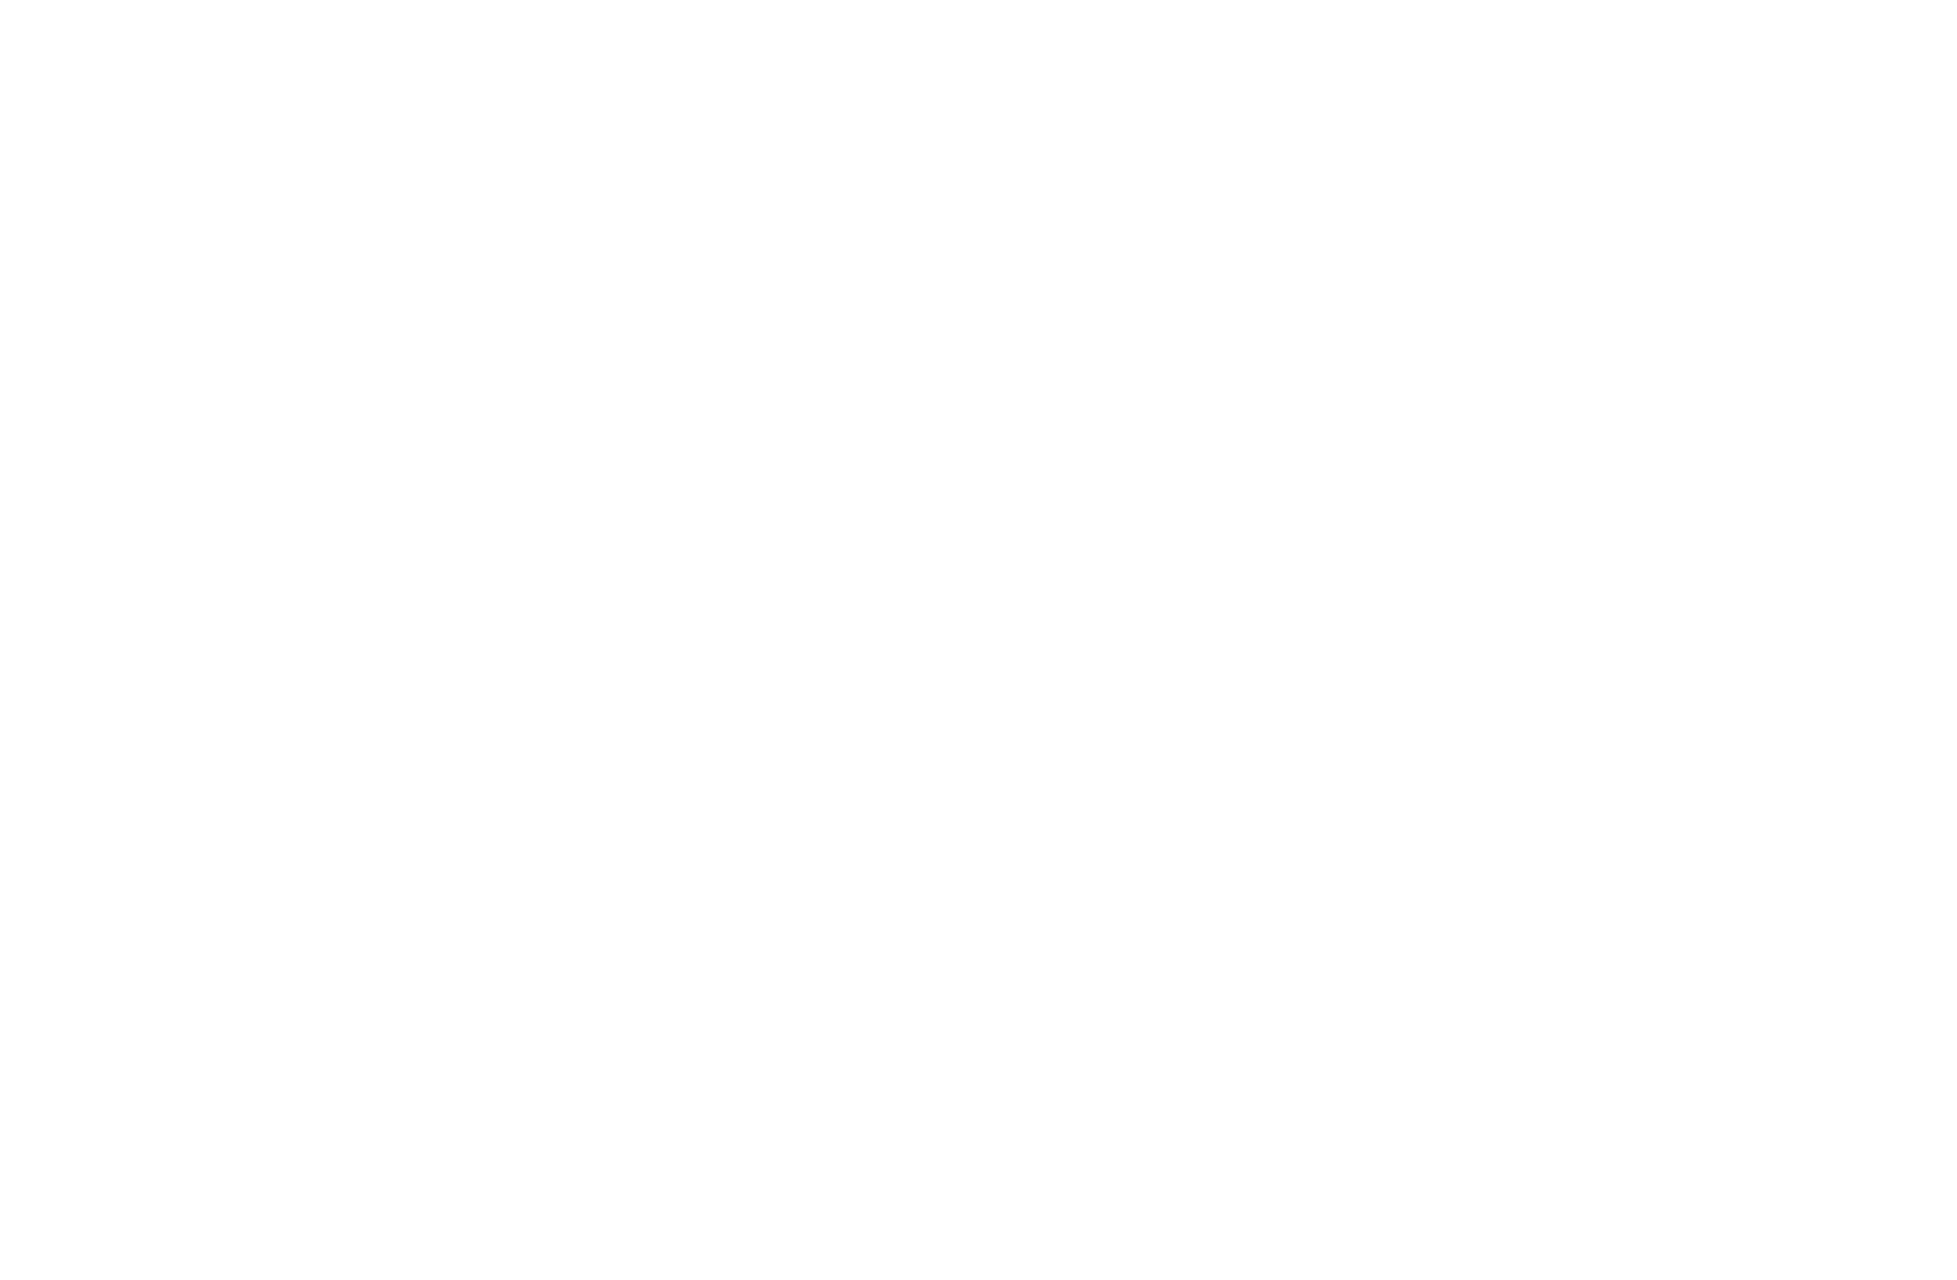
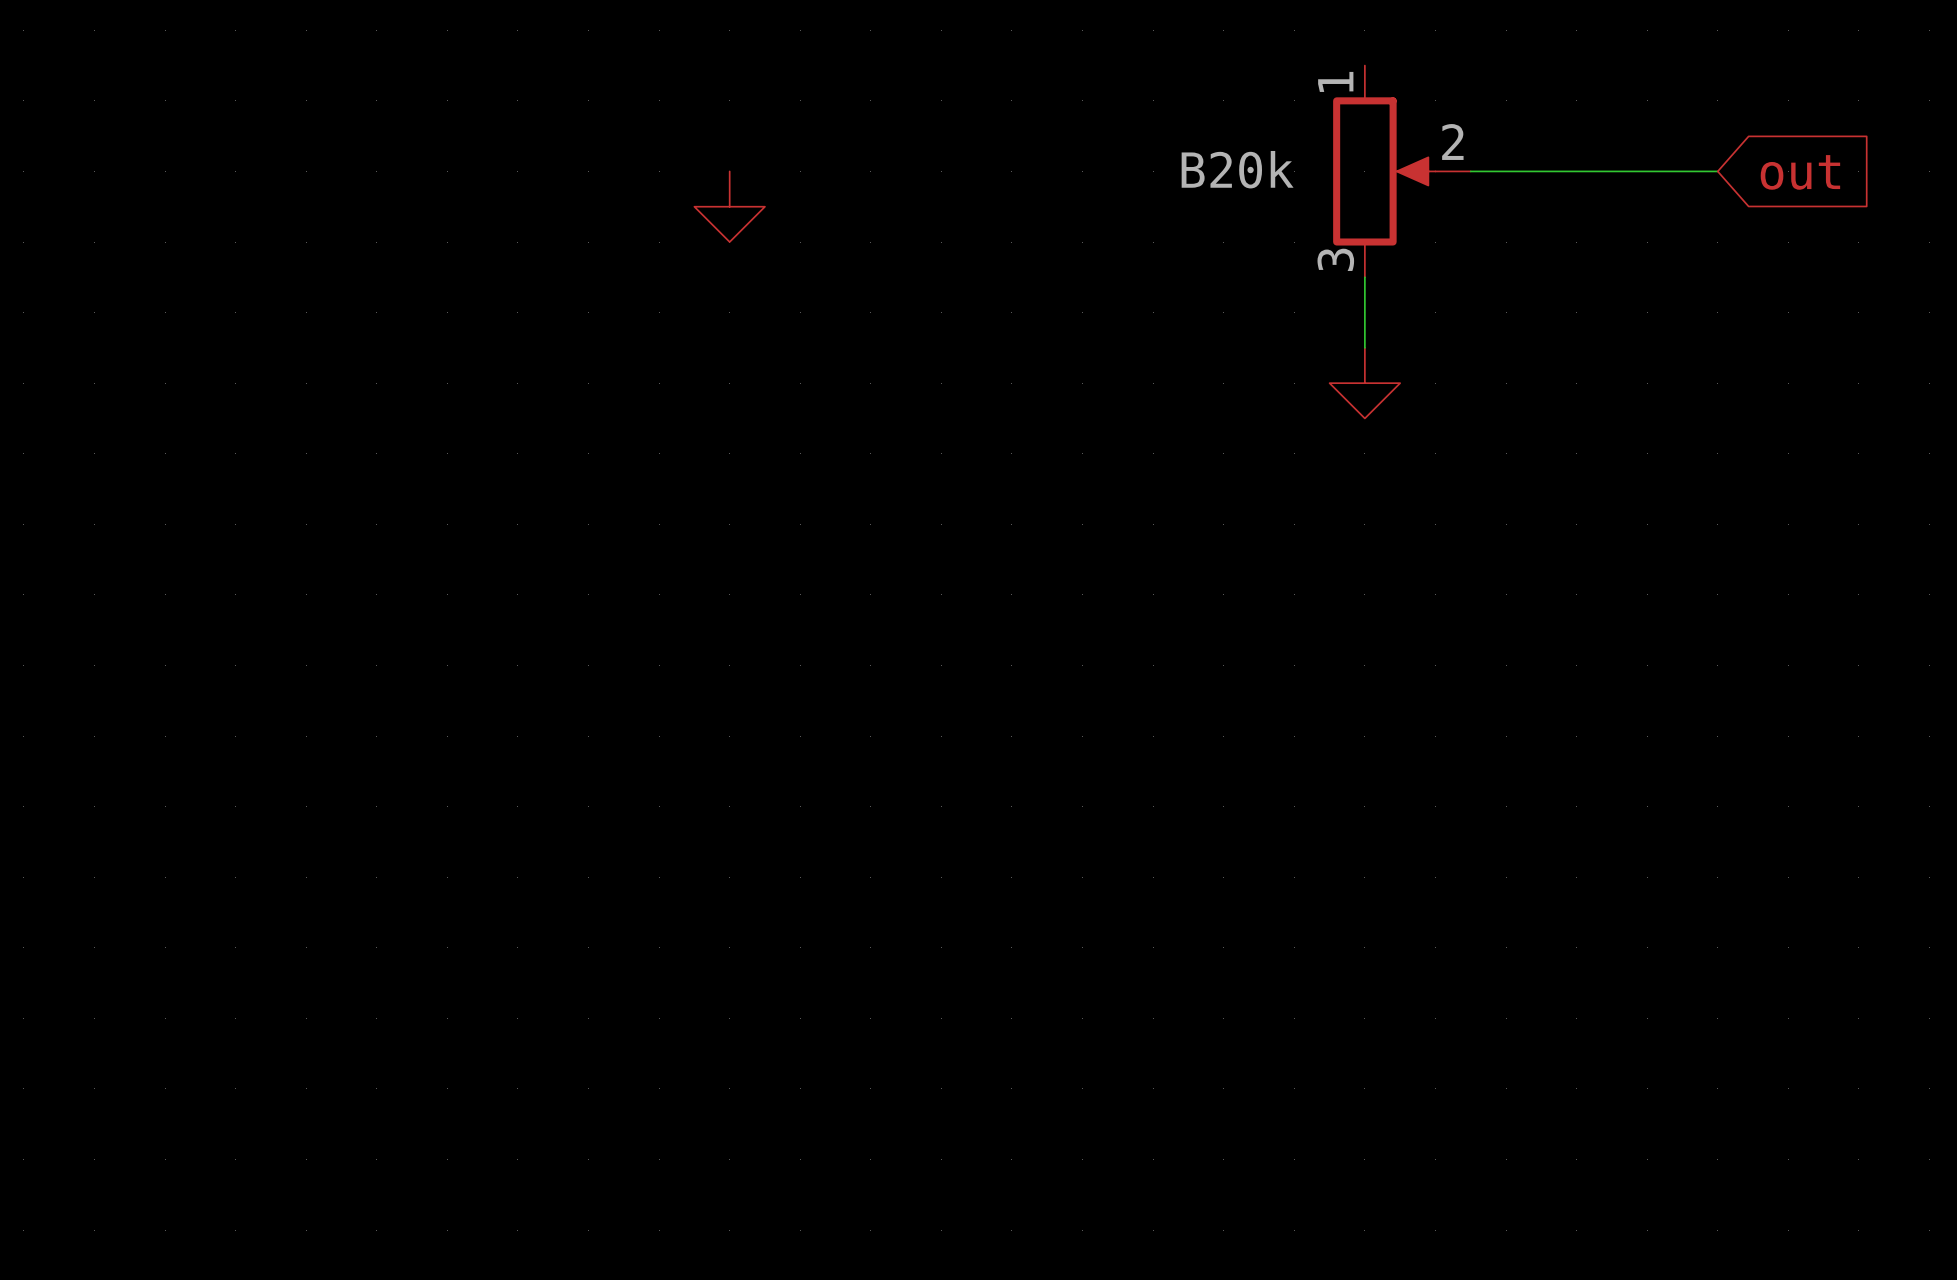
part: none -> B20k (1401, 171)
wire: none -> (1470, 171) (1717, 171)
global label: none -> out (1800, 172)
power symbol: none -> (729, 206)
wire: none -> (1364, 277) (1364, 347)
power symbol: none -> (1364, 383)

